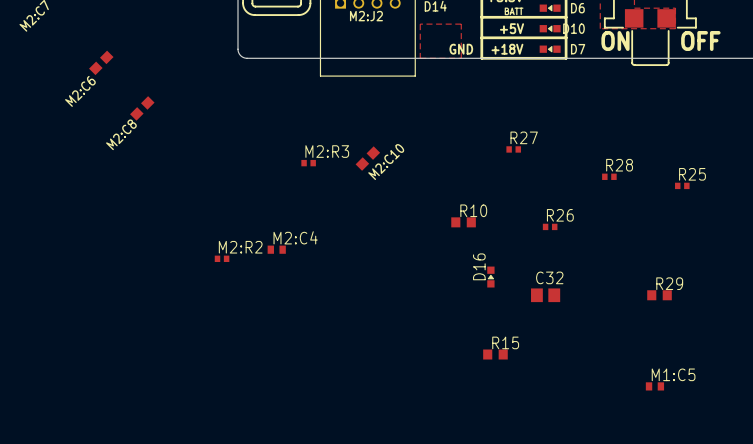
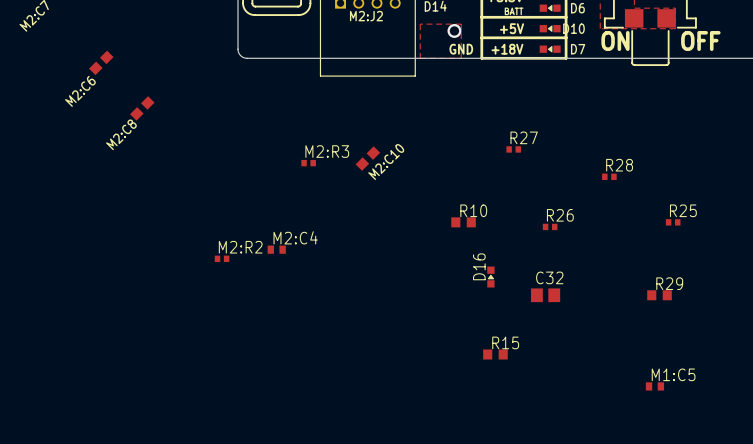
via: none -> (454, 30)
R25 position: (682, 185) -> (673, 222)

